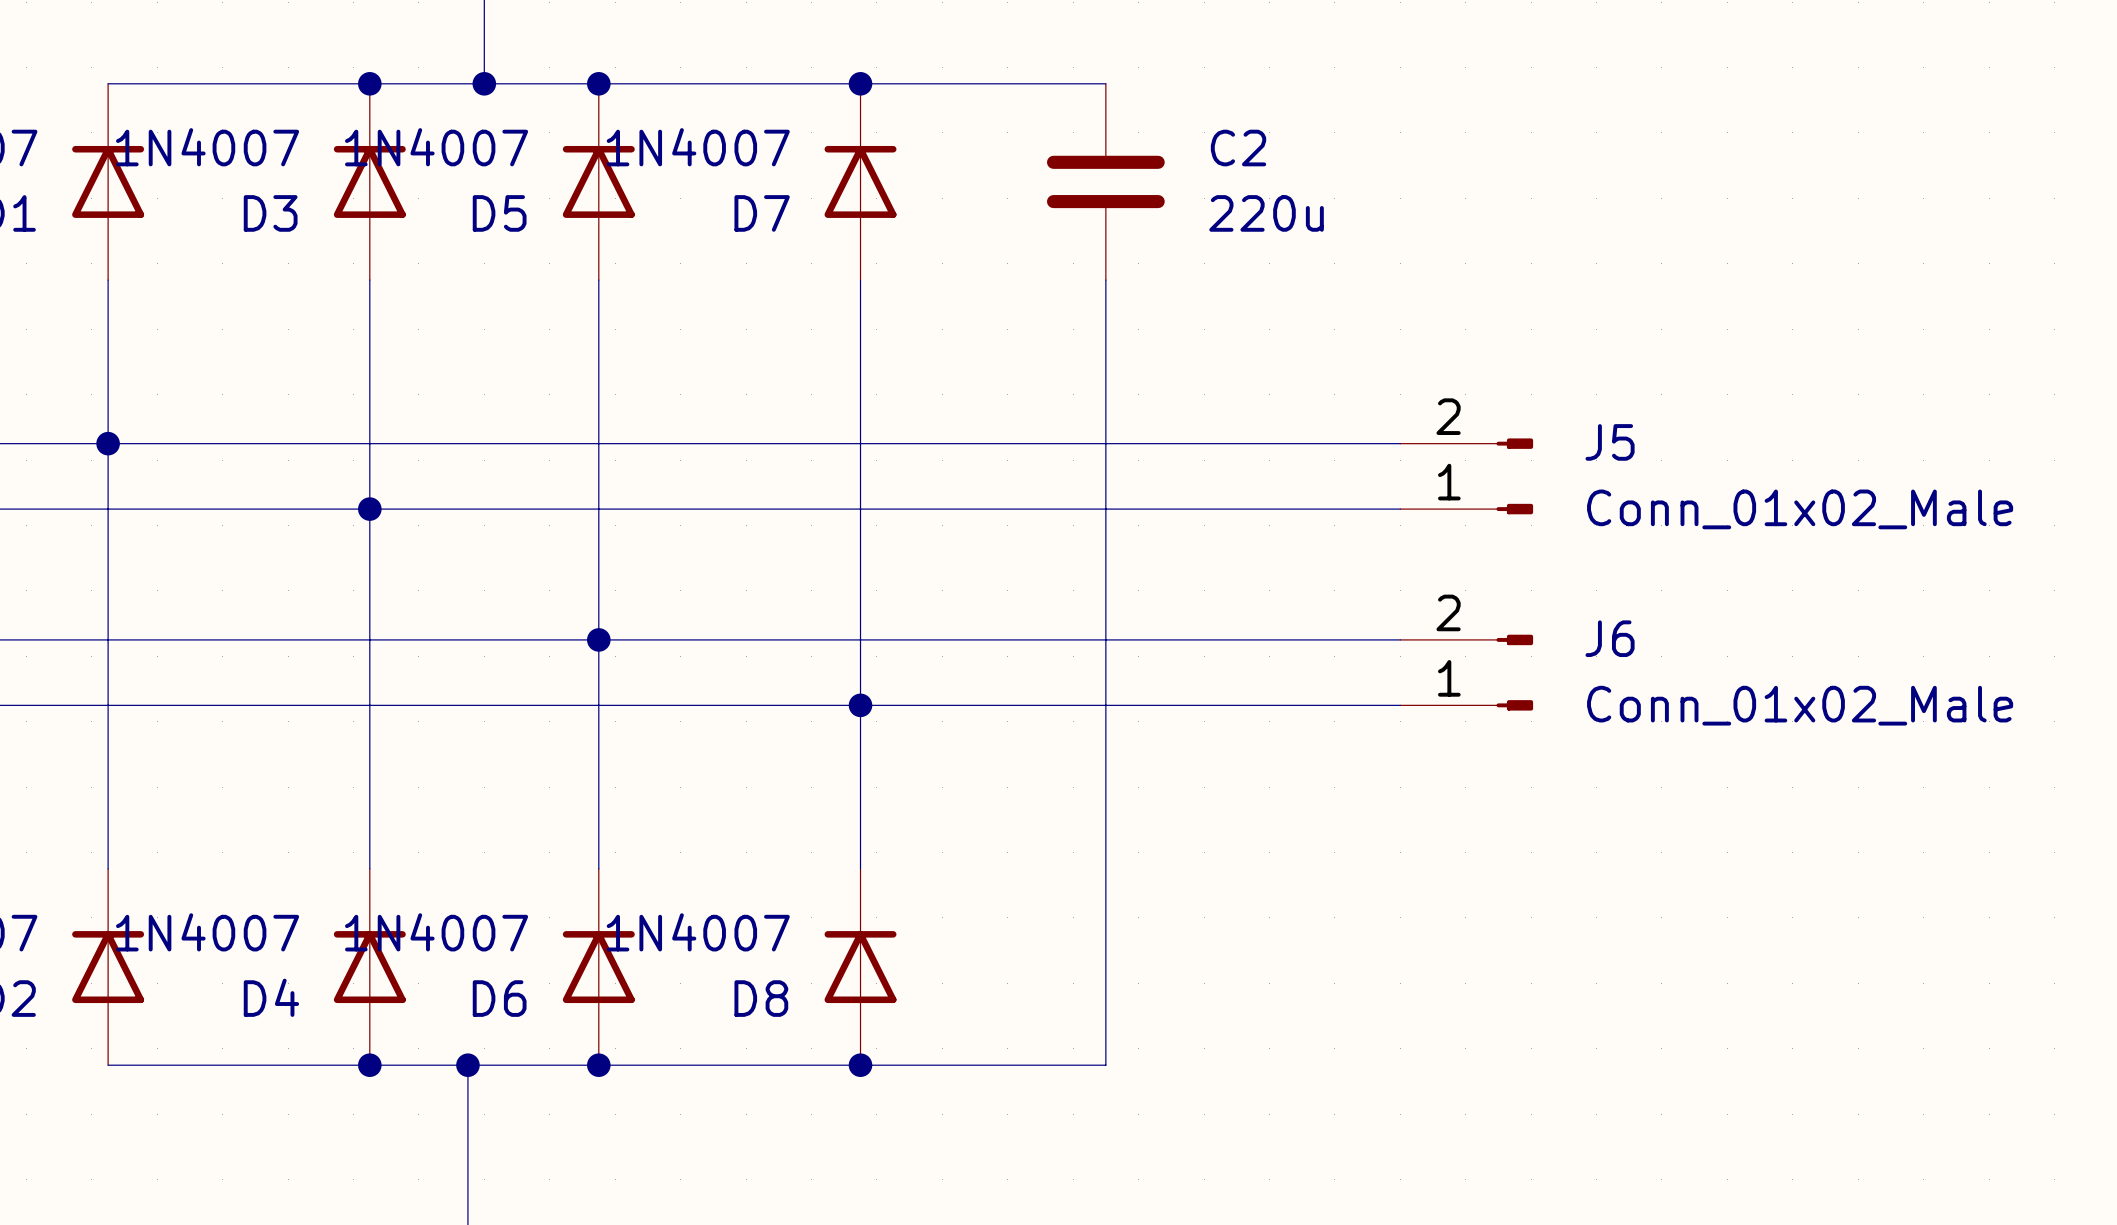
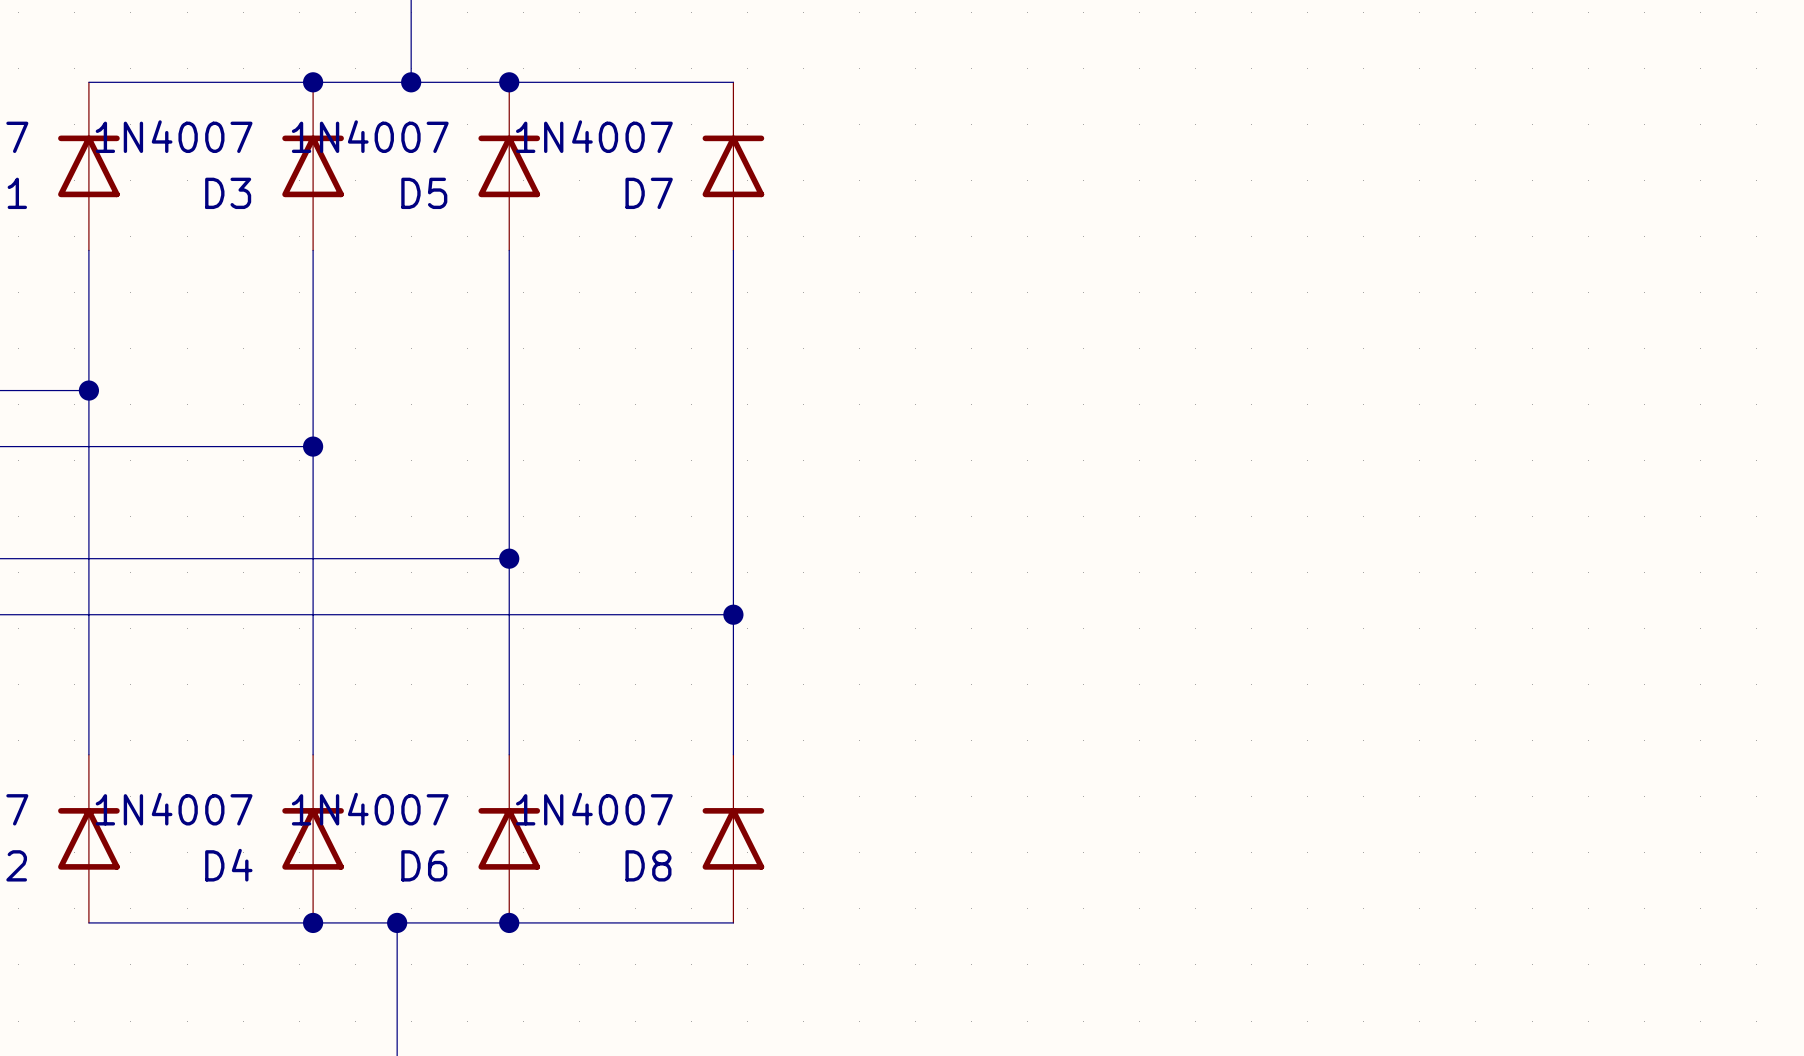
wire: (860, 83) (1105, 83) -> none
junction: (860, 83) -> none
C2: 220u (1105, 181) -> none
wire: (1105, 280) (1105, 1065) (860, 1065) -> none
wire: (108, 443) (1400, 443) -> none
J5: Conn_01x02_Male (1466, 476) -> none
wire: (369, 509) (1400, 509) -> none
wire: (598, 639) (1400, 639) -> none
J6: Conn_01x02_Male (1466, 672) -> none
wire: (860, 705) (1400, 705) -> none
junction: (860, 1065) -> none

